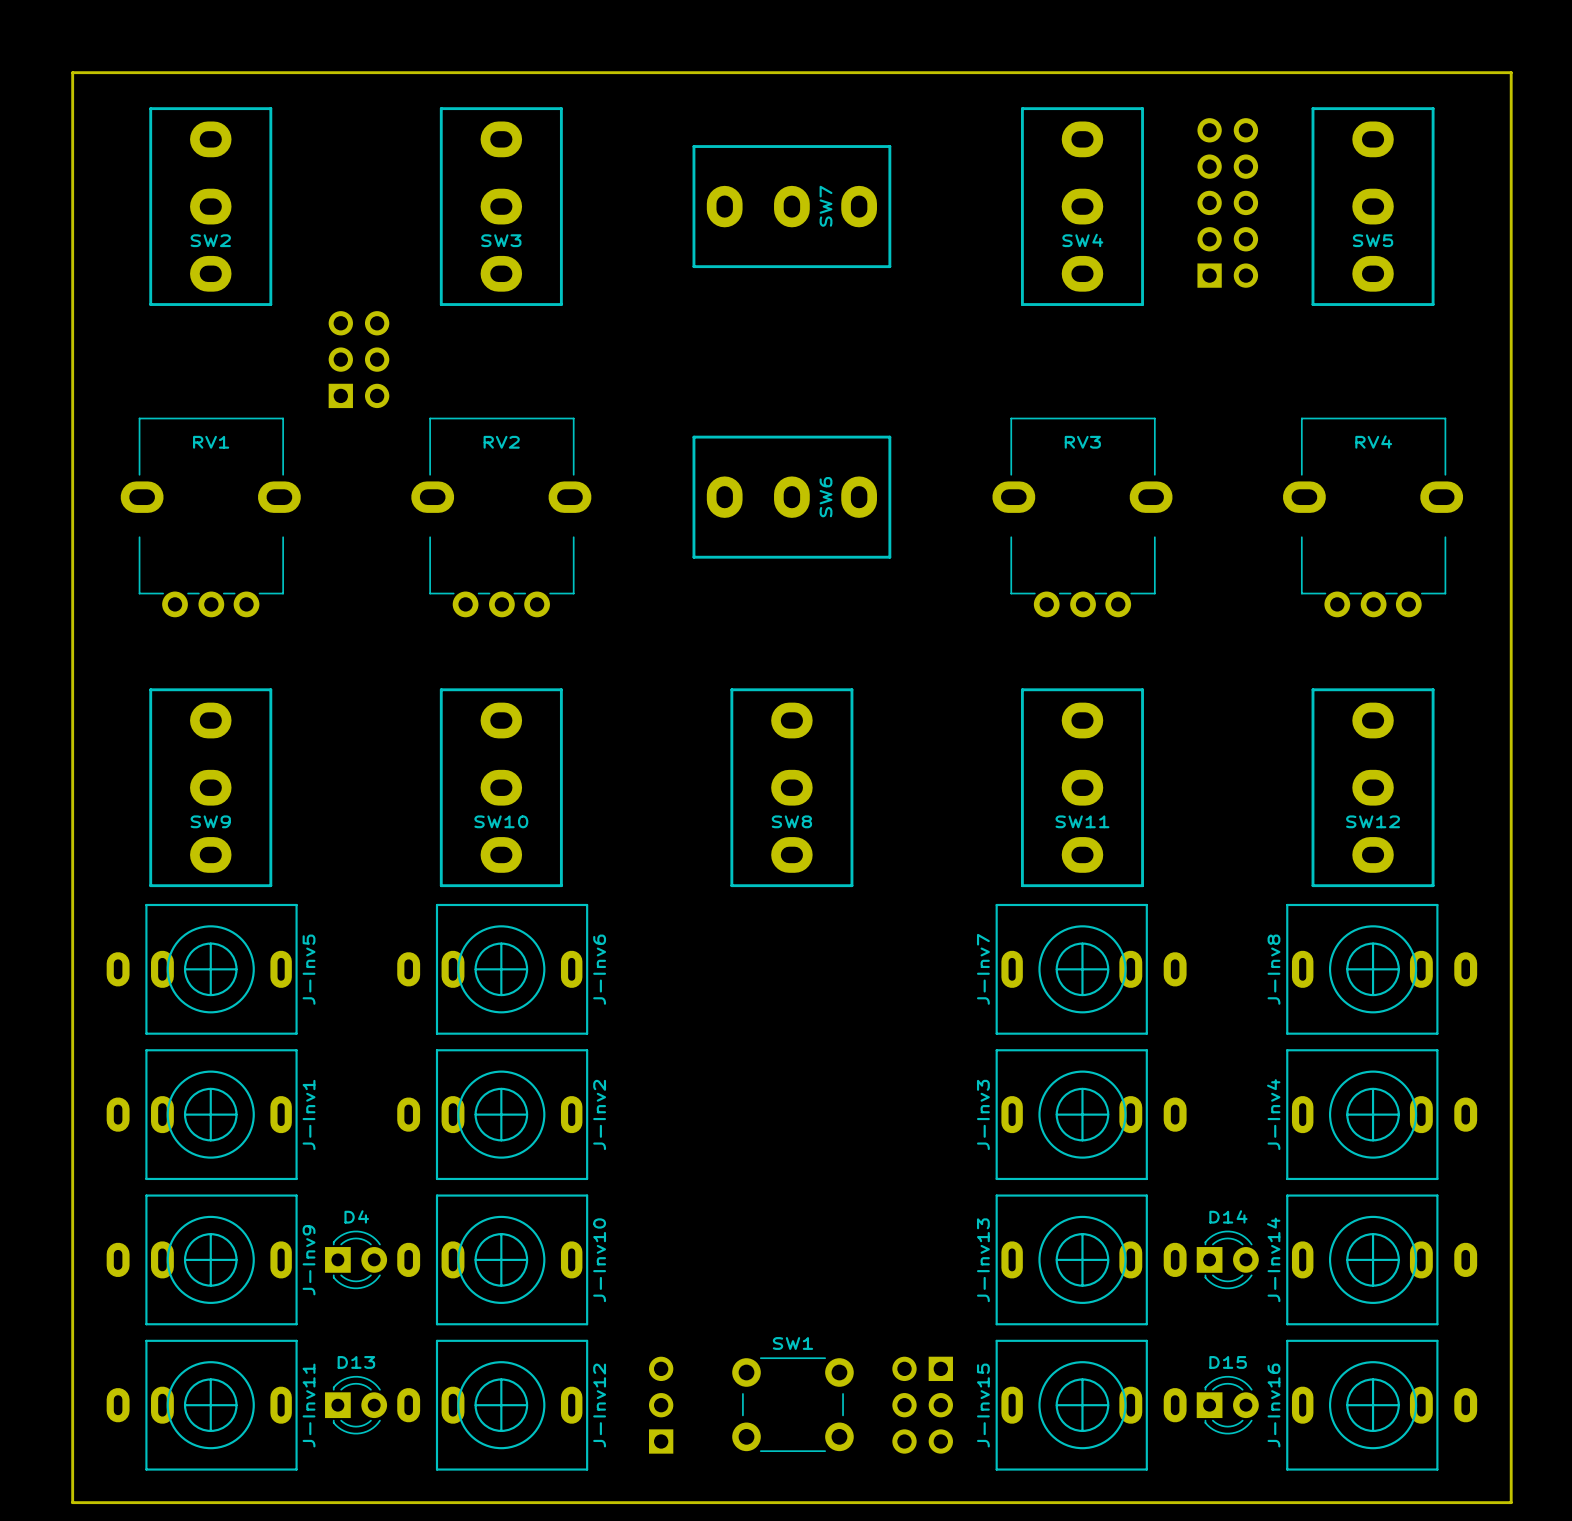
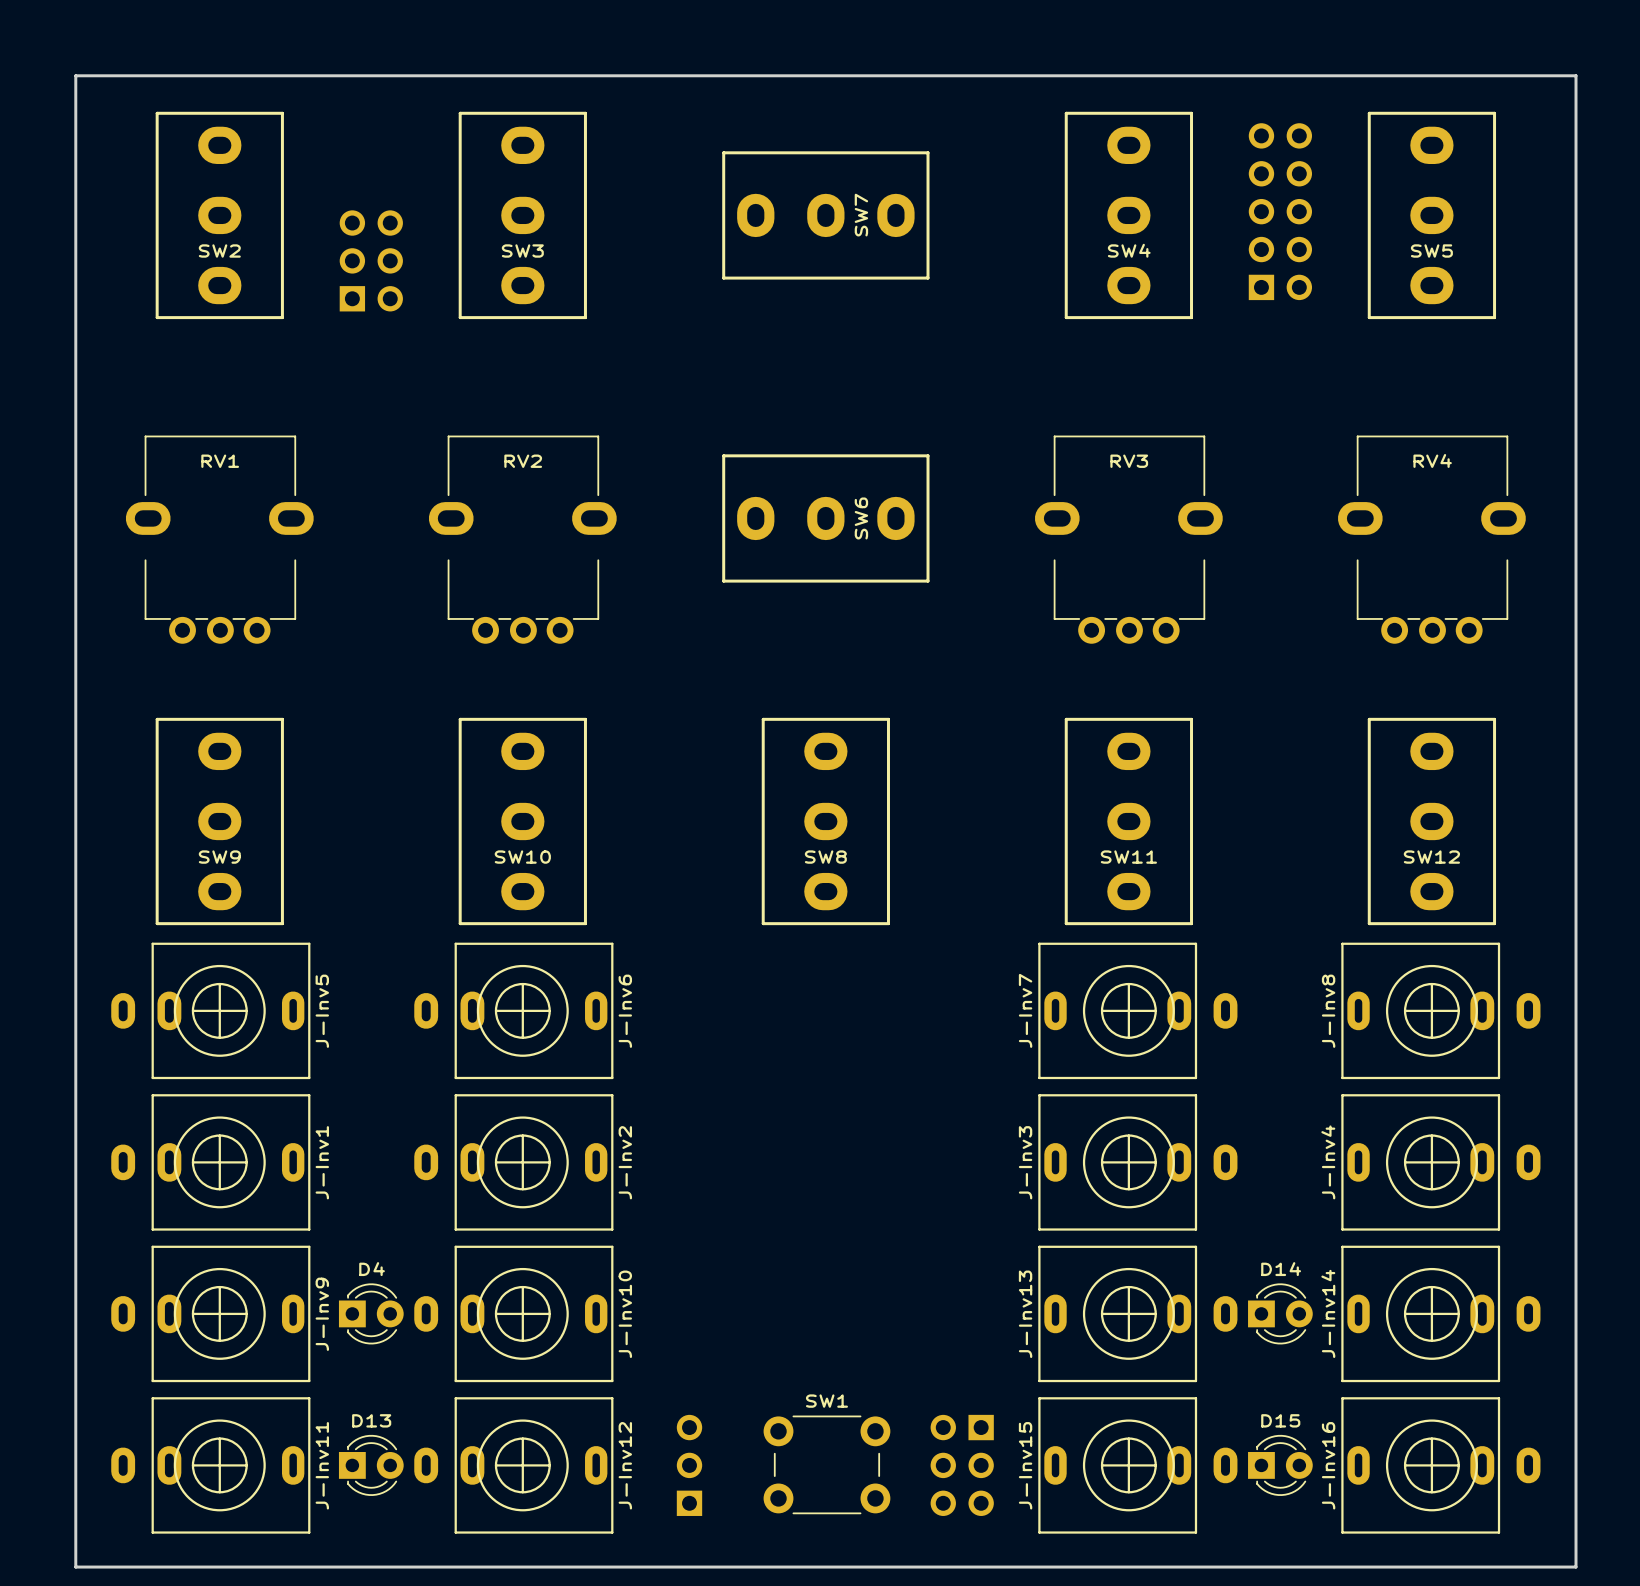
part position: (358, 359) -> (371, 260)

